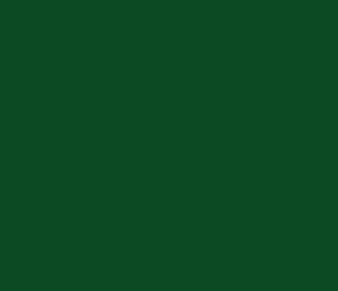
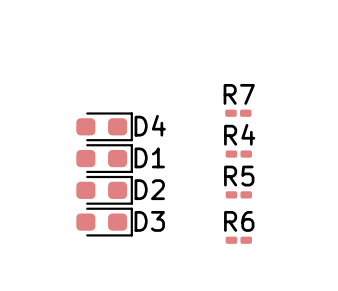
R7: none -> (238, 113)
D4: none -> (104, 126)
R4: none -> (238, 154)
D1: none -> (104, 158)
D2: none -> (104, 190)
R5: none -> (238, 194)
D3: none -> (104, 222)
R6: none -> (238, 240)

